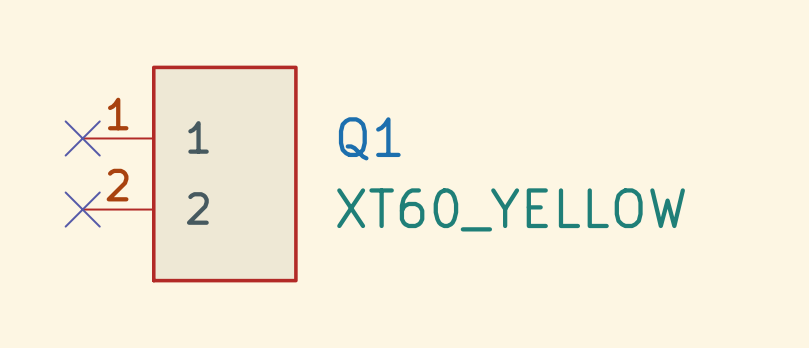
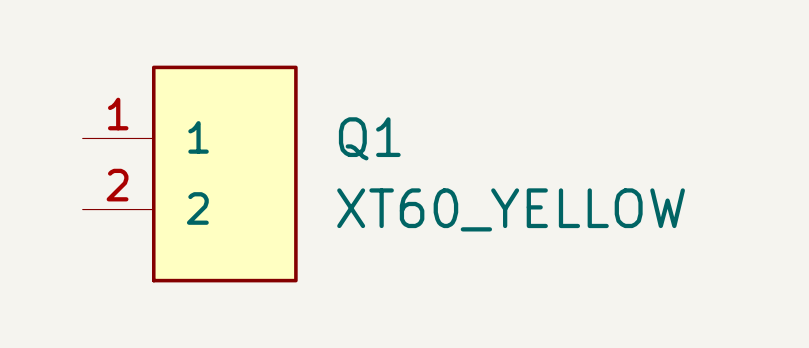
no-connect mark: (82, 138) -> none
no-connect mark: (82, 209) -> none

